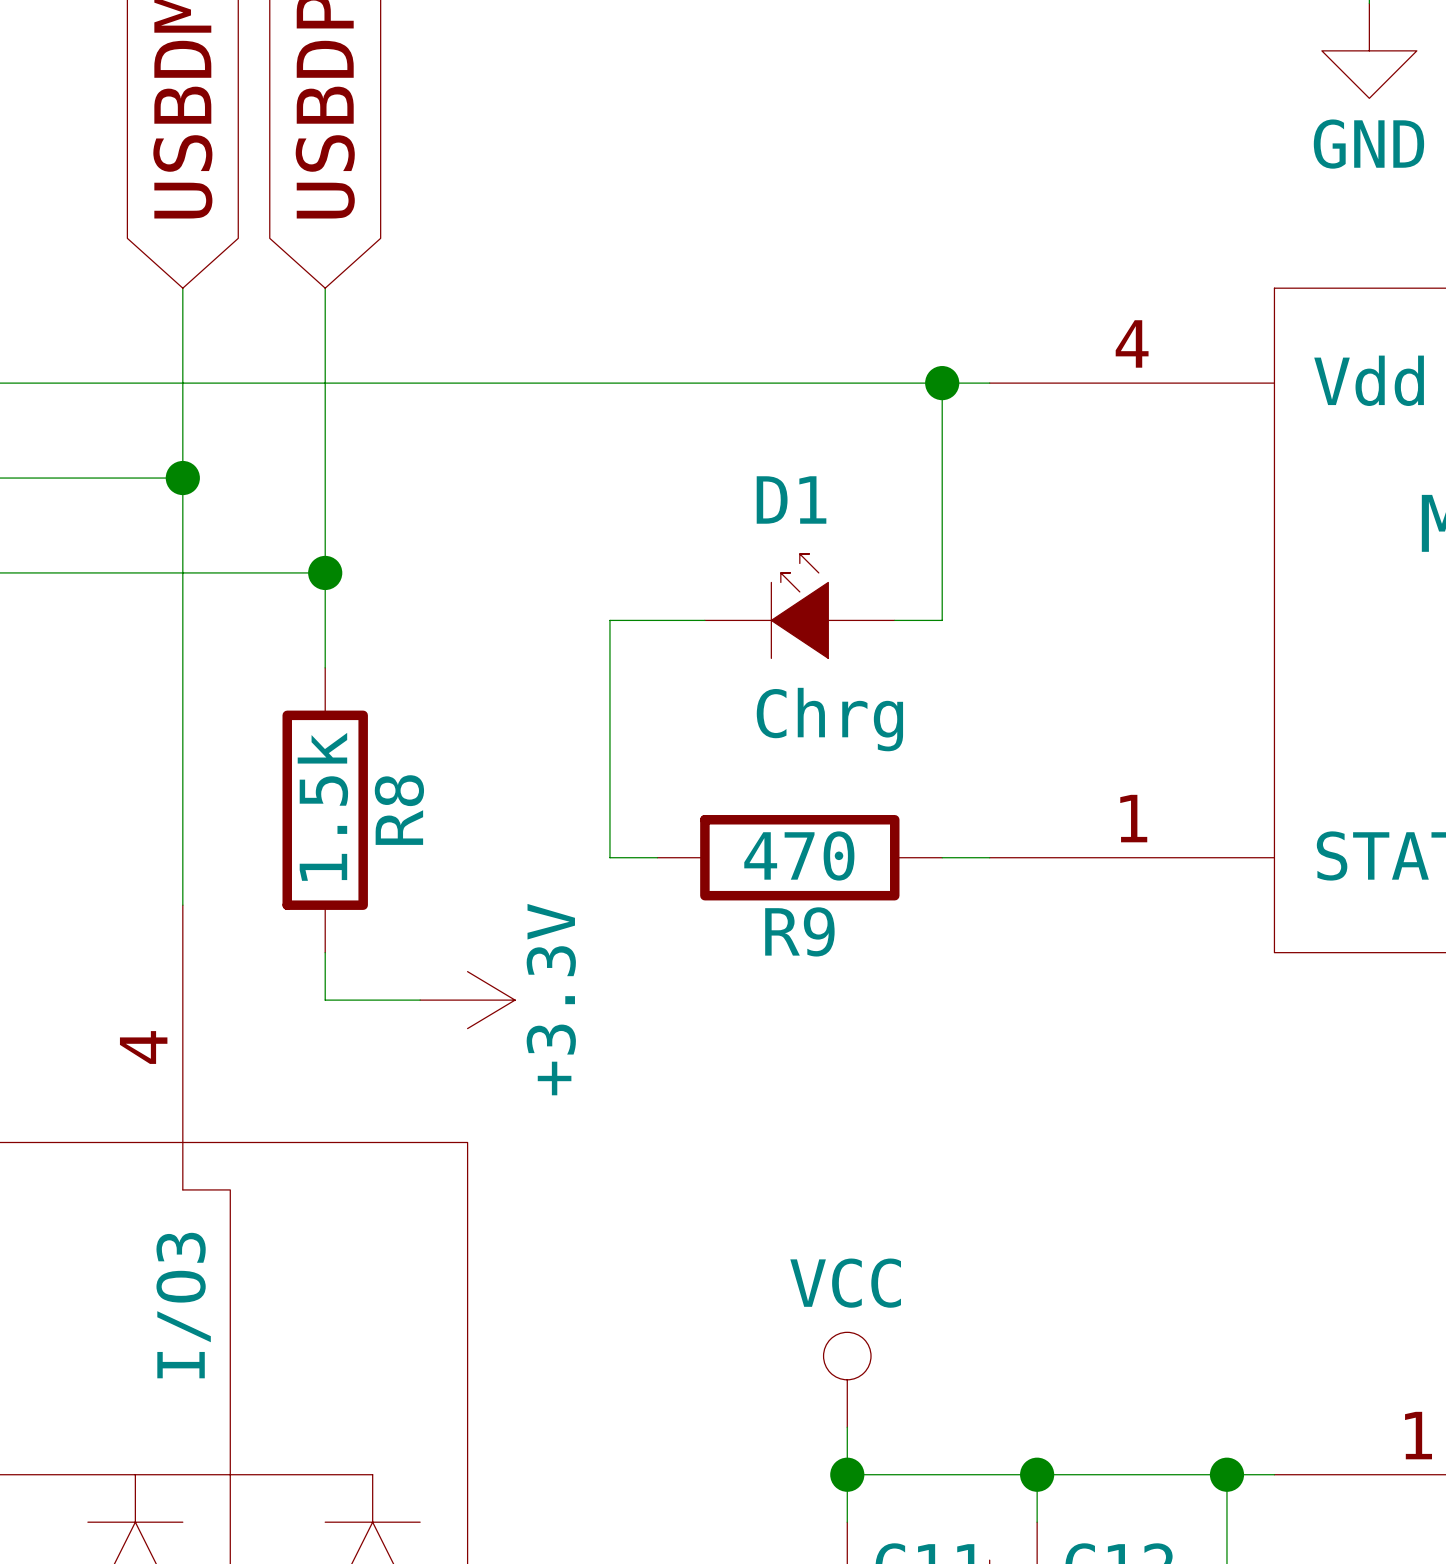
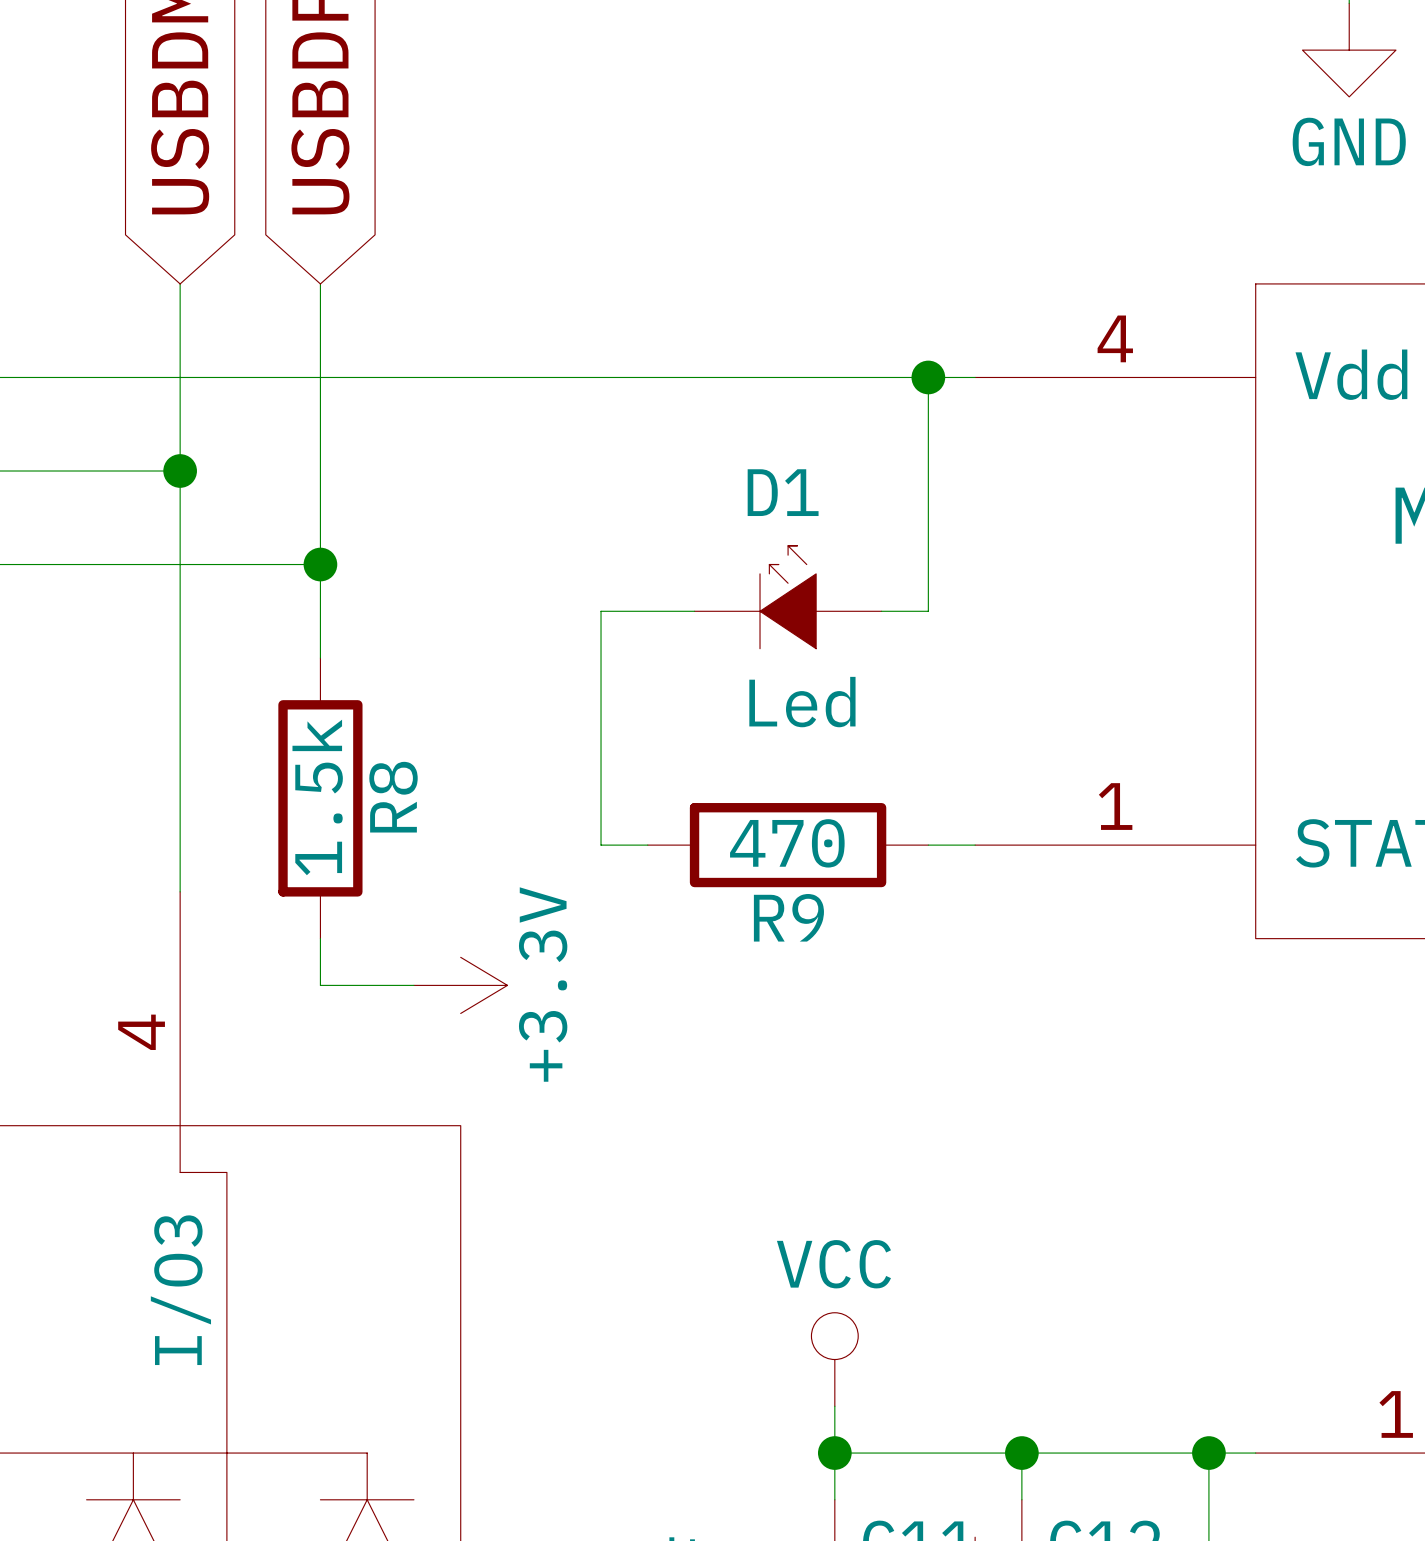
D1 value: Chrg (829, 719) -> Led (802, 702)

